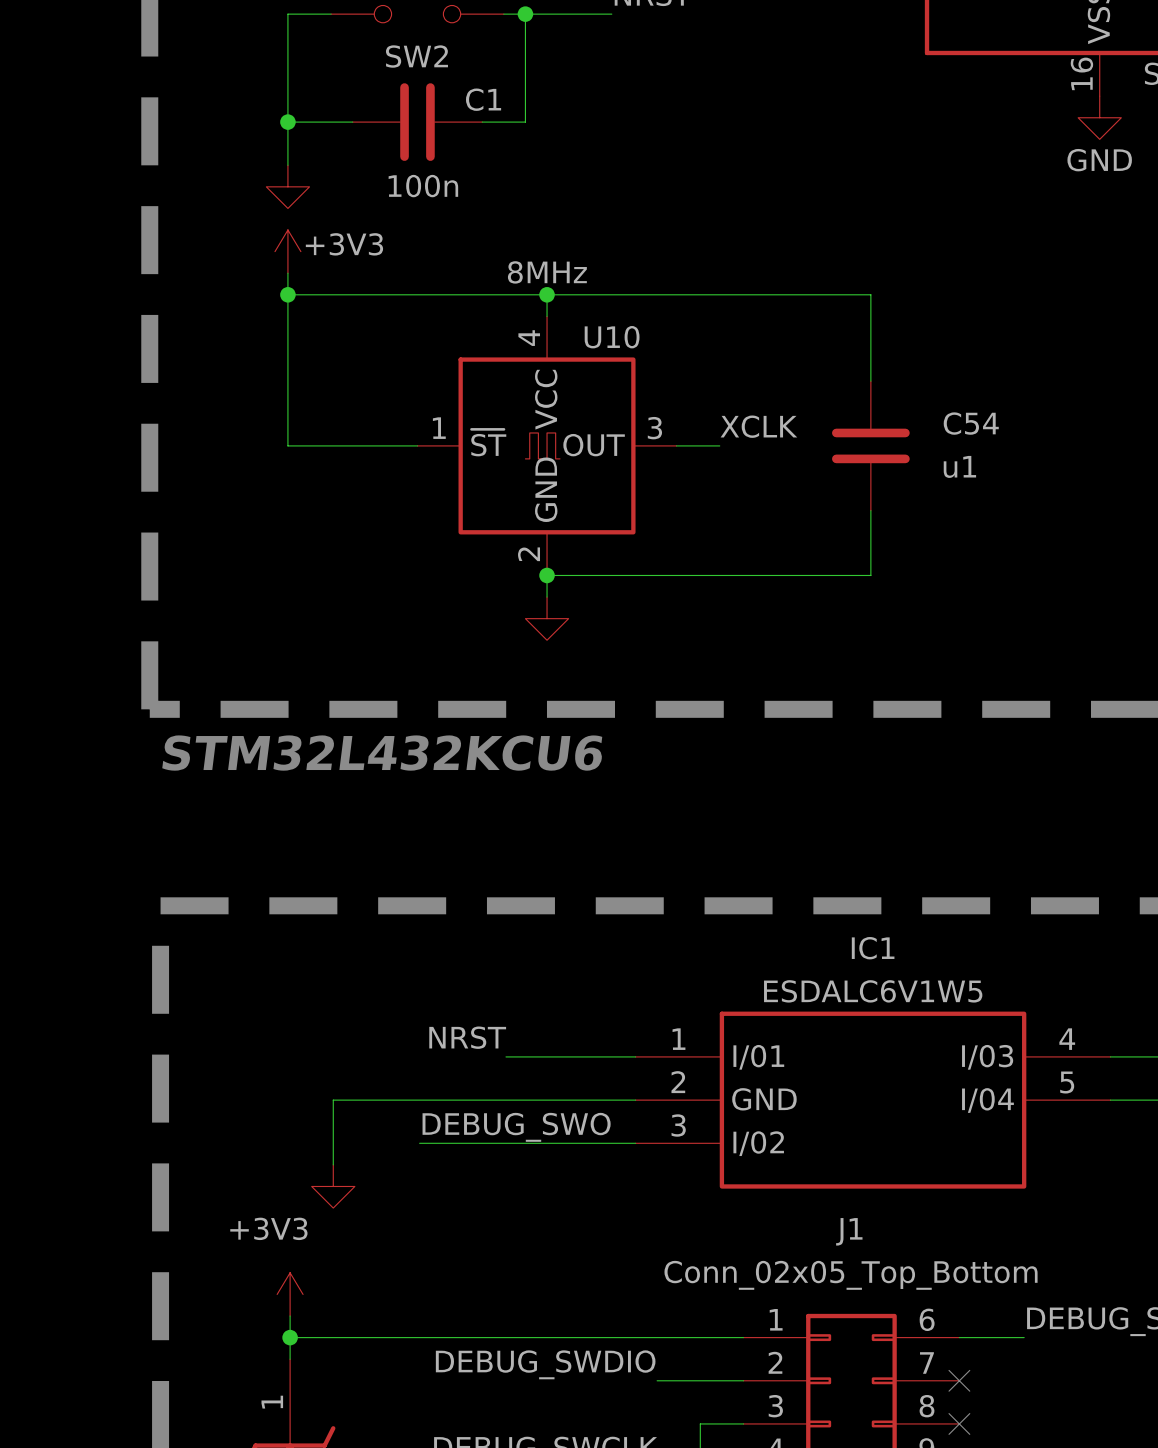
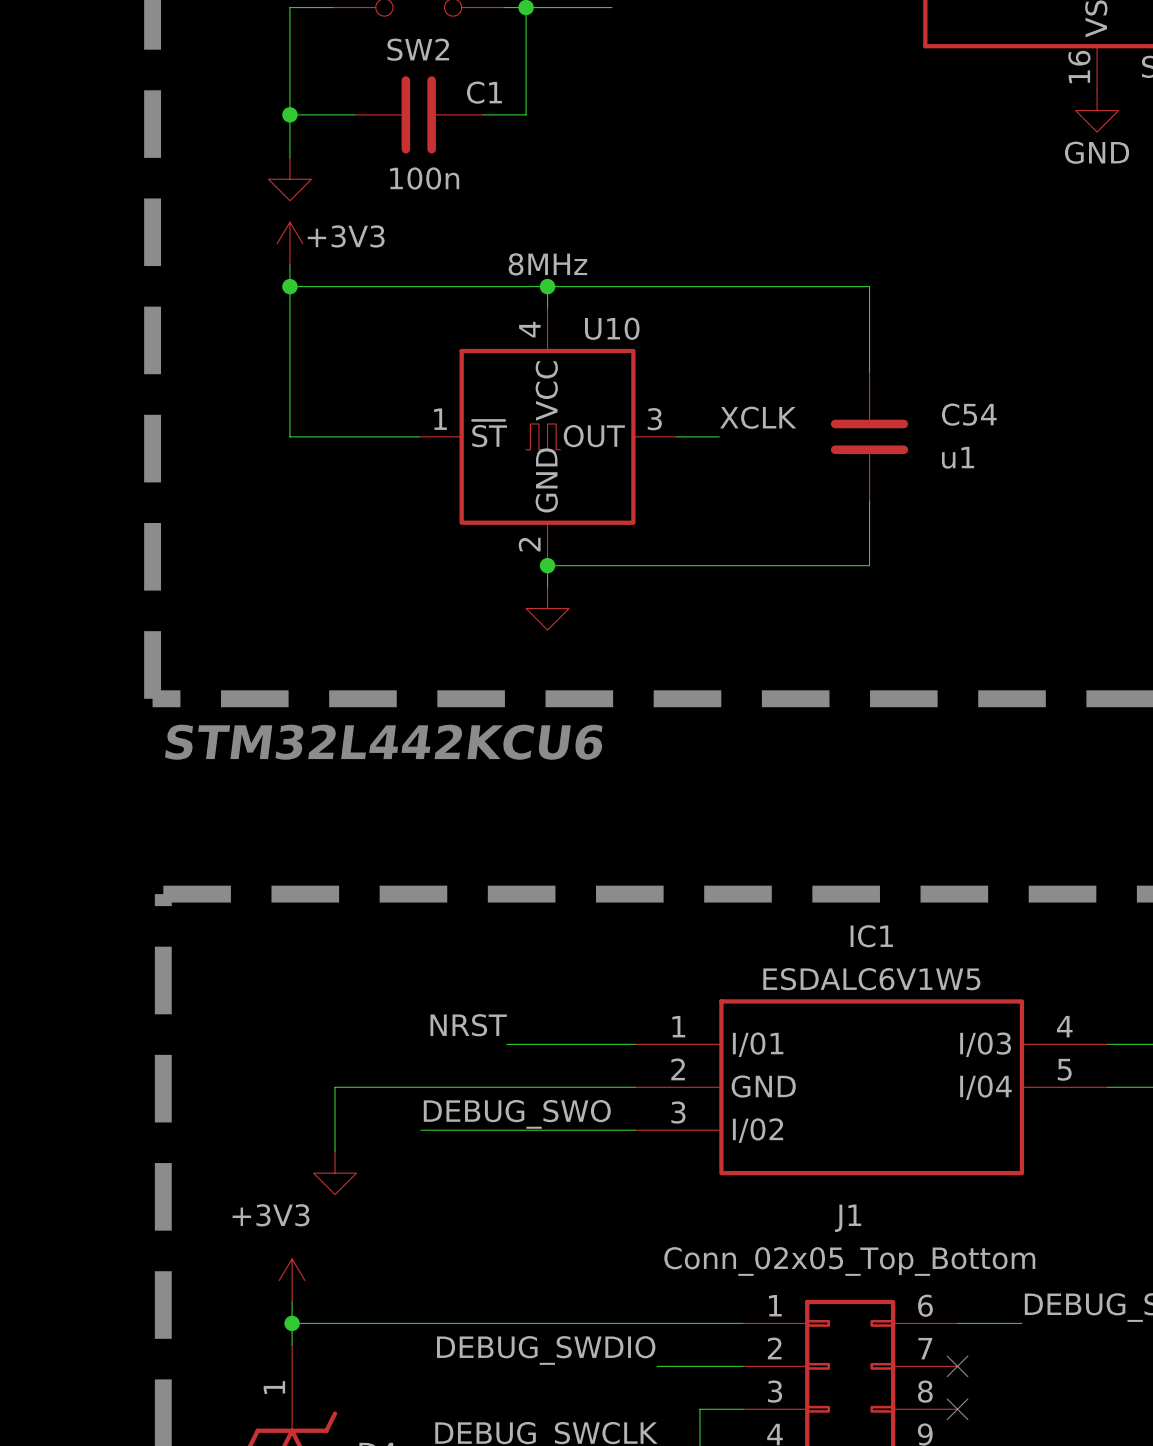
text: STM32L432KCU6 (382, 753) -> STM32L442KCU6 (383, 742)

